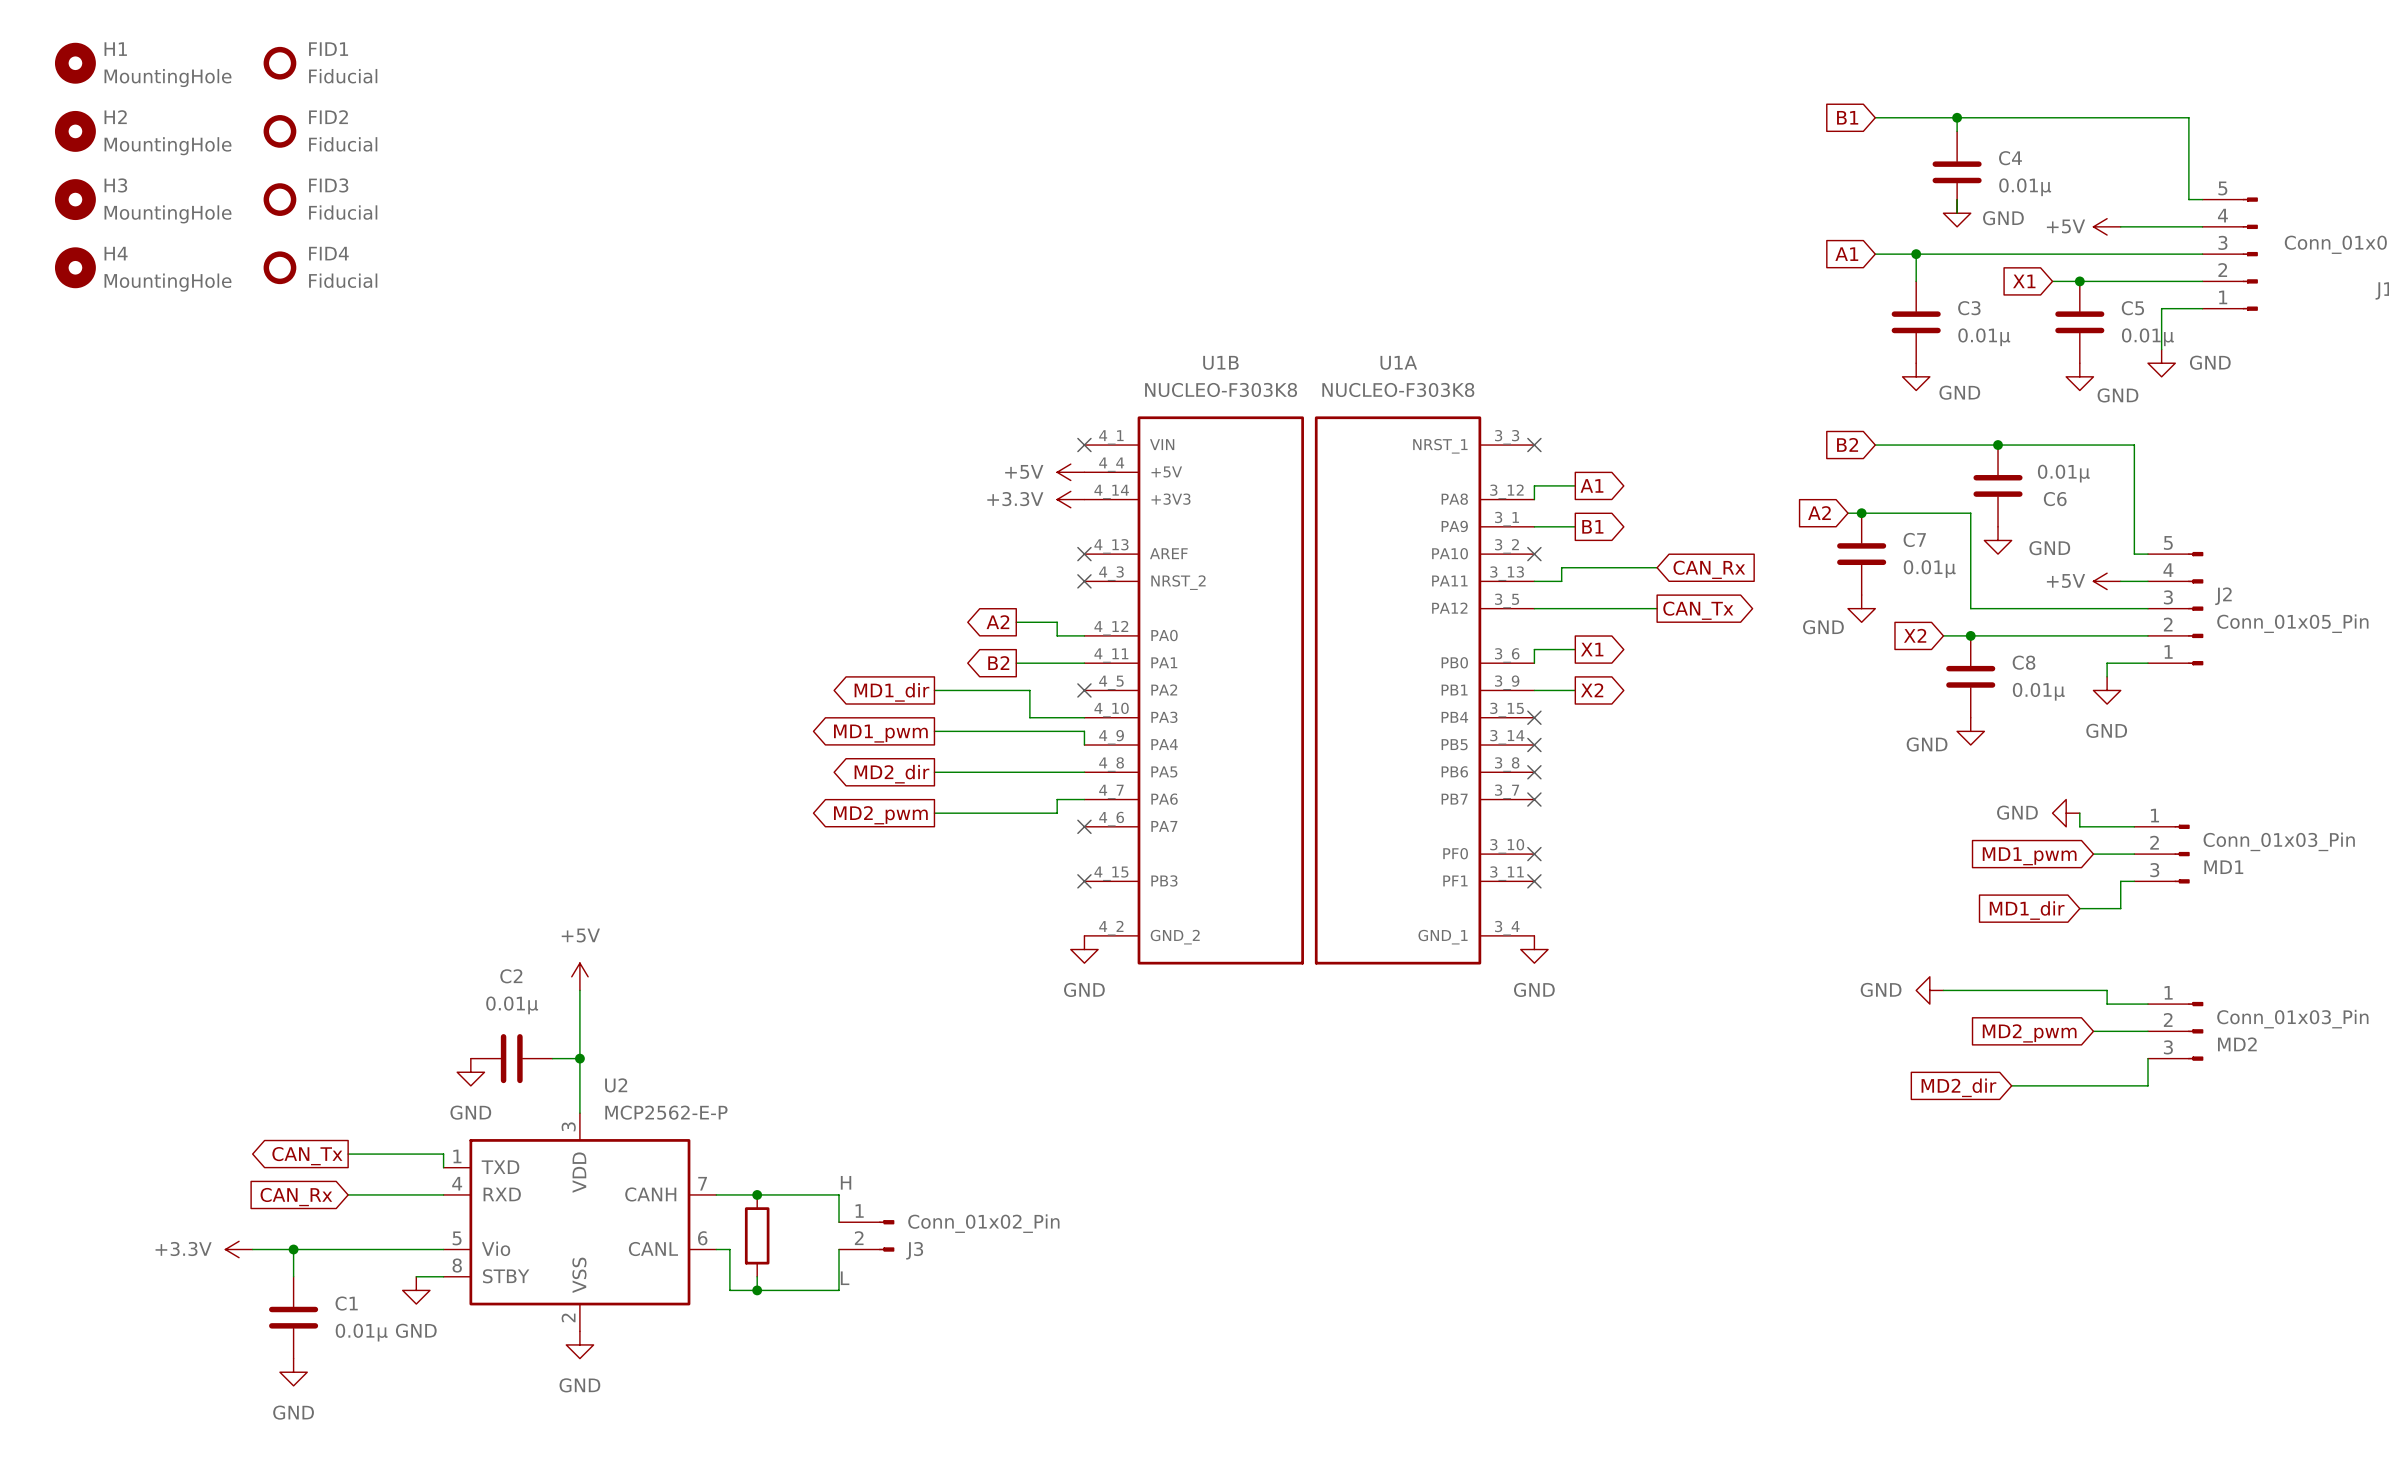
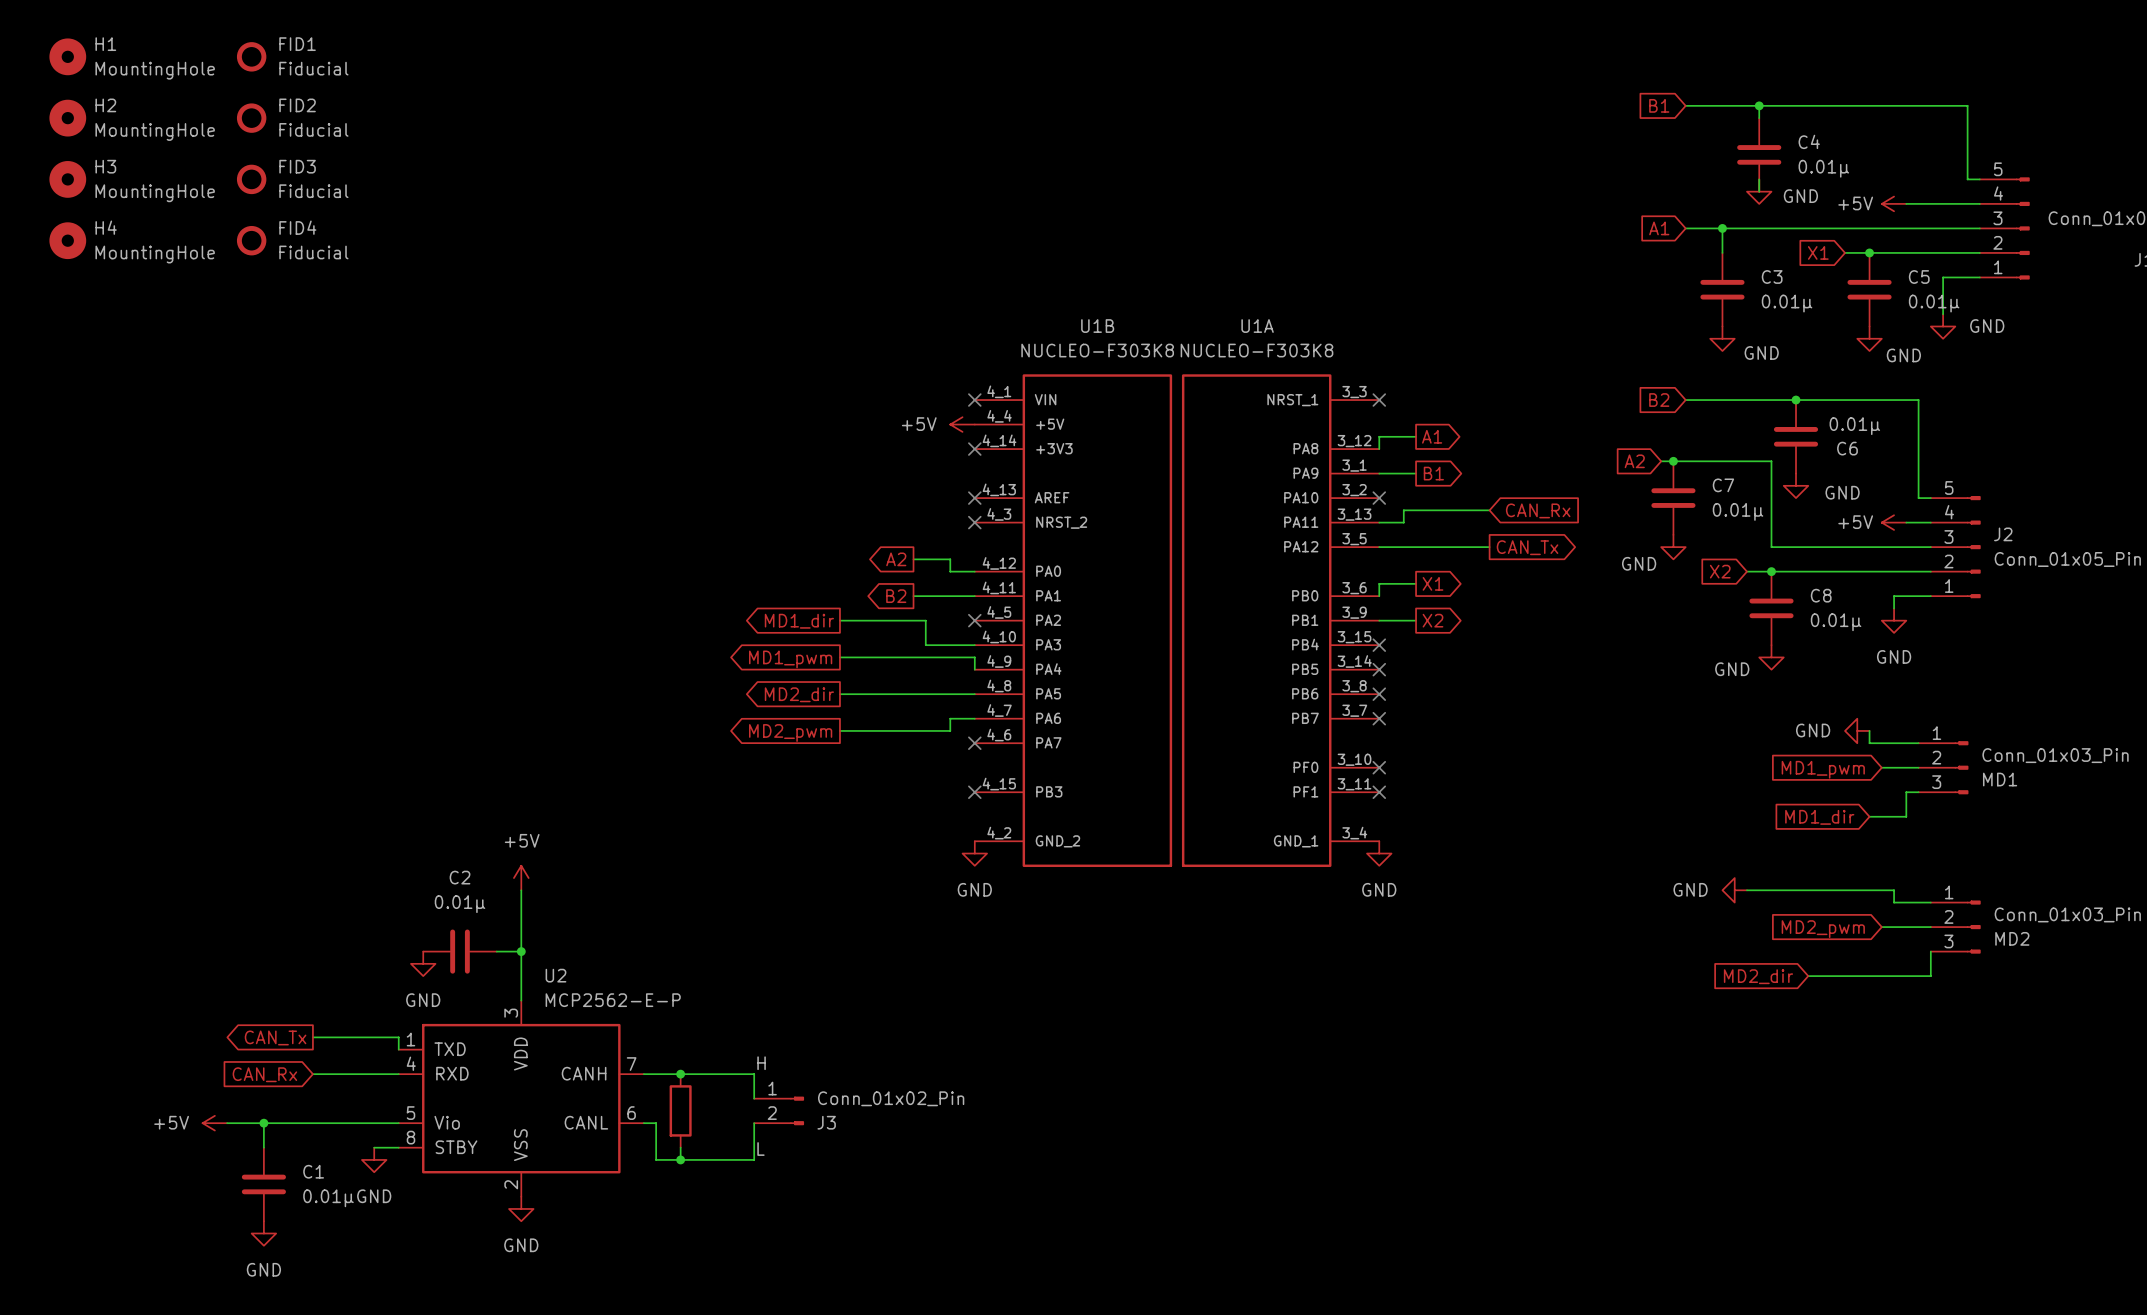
power symbol: +3.3V (1070, 499) -> none
no-connect mark: none -> (974, 449)
power symbol: +3.3V (239, 1249) -> +5V (214, 1123)

